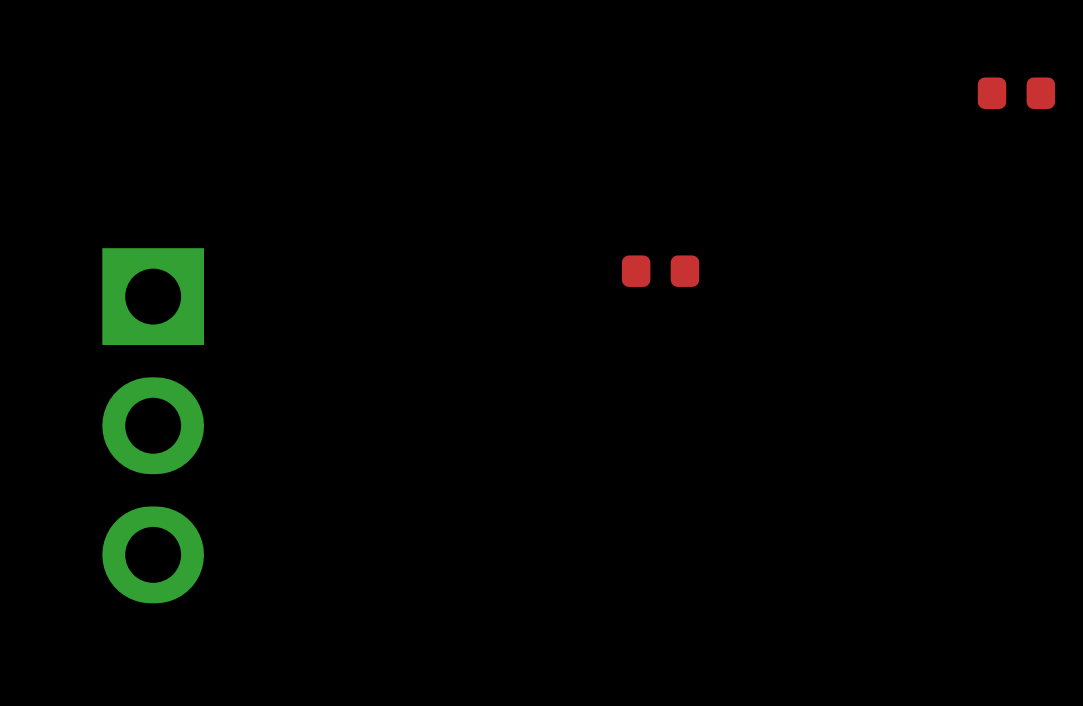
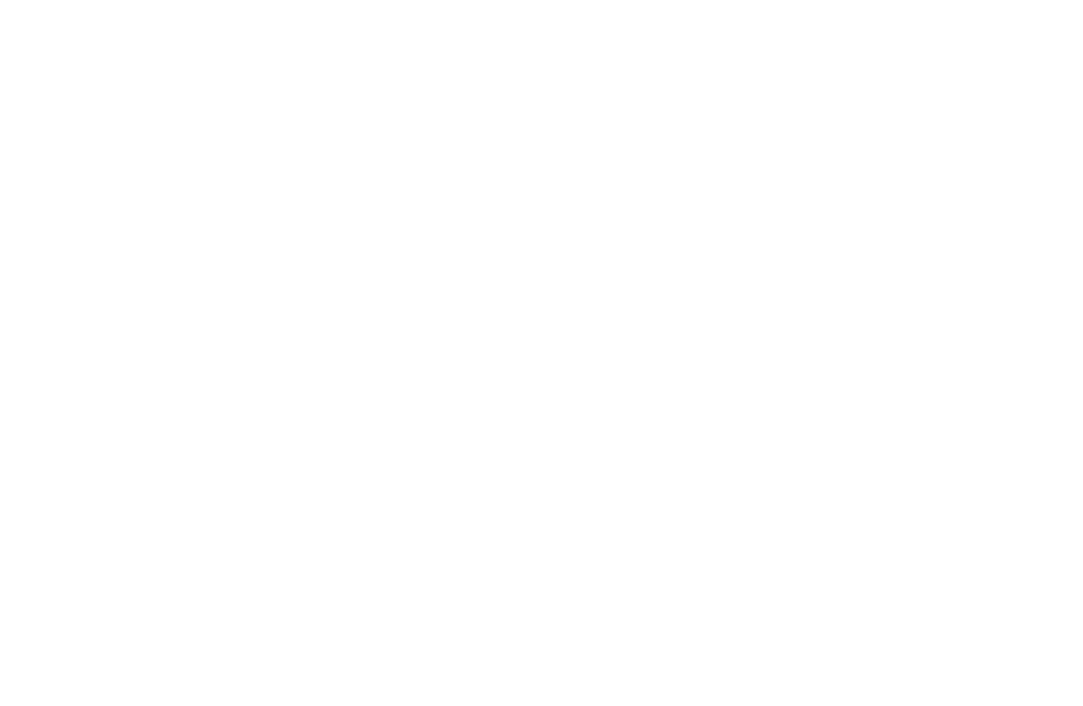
part: (1016, 93) -> none
part: (660, 271) -> none
part: (153, 425) -> none

